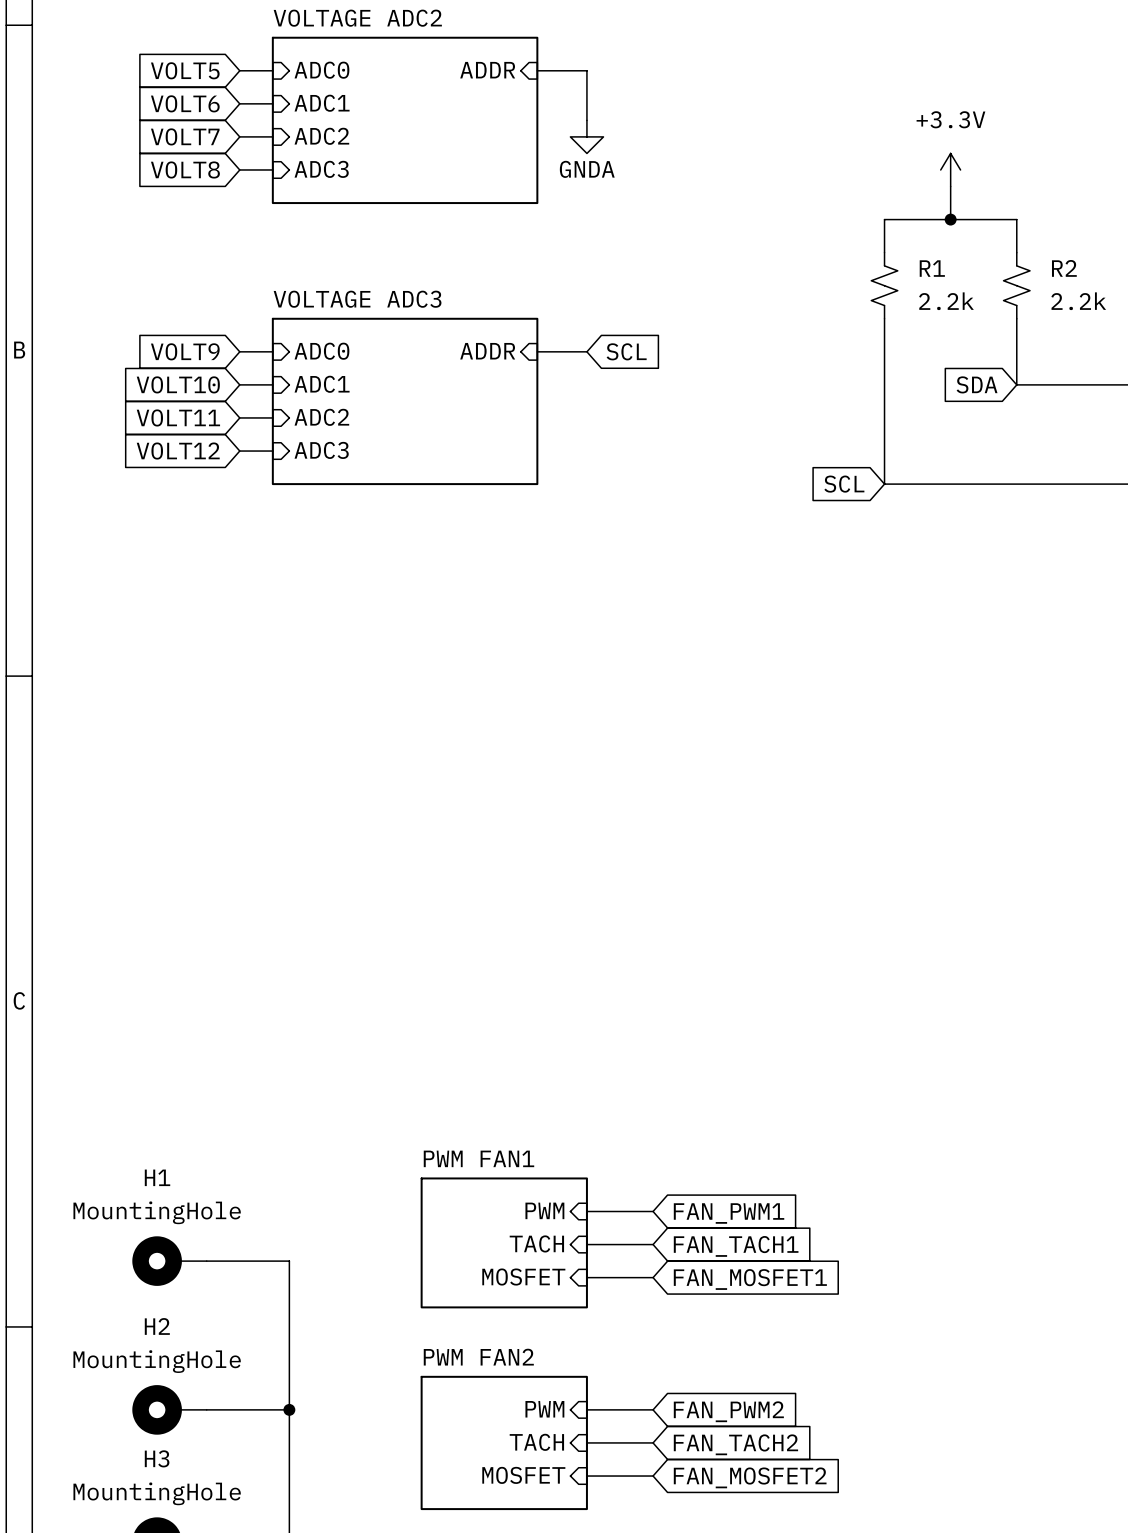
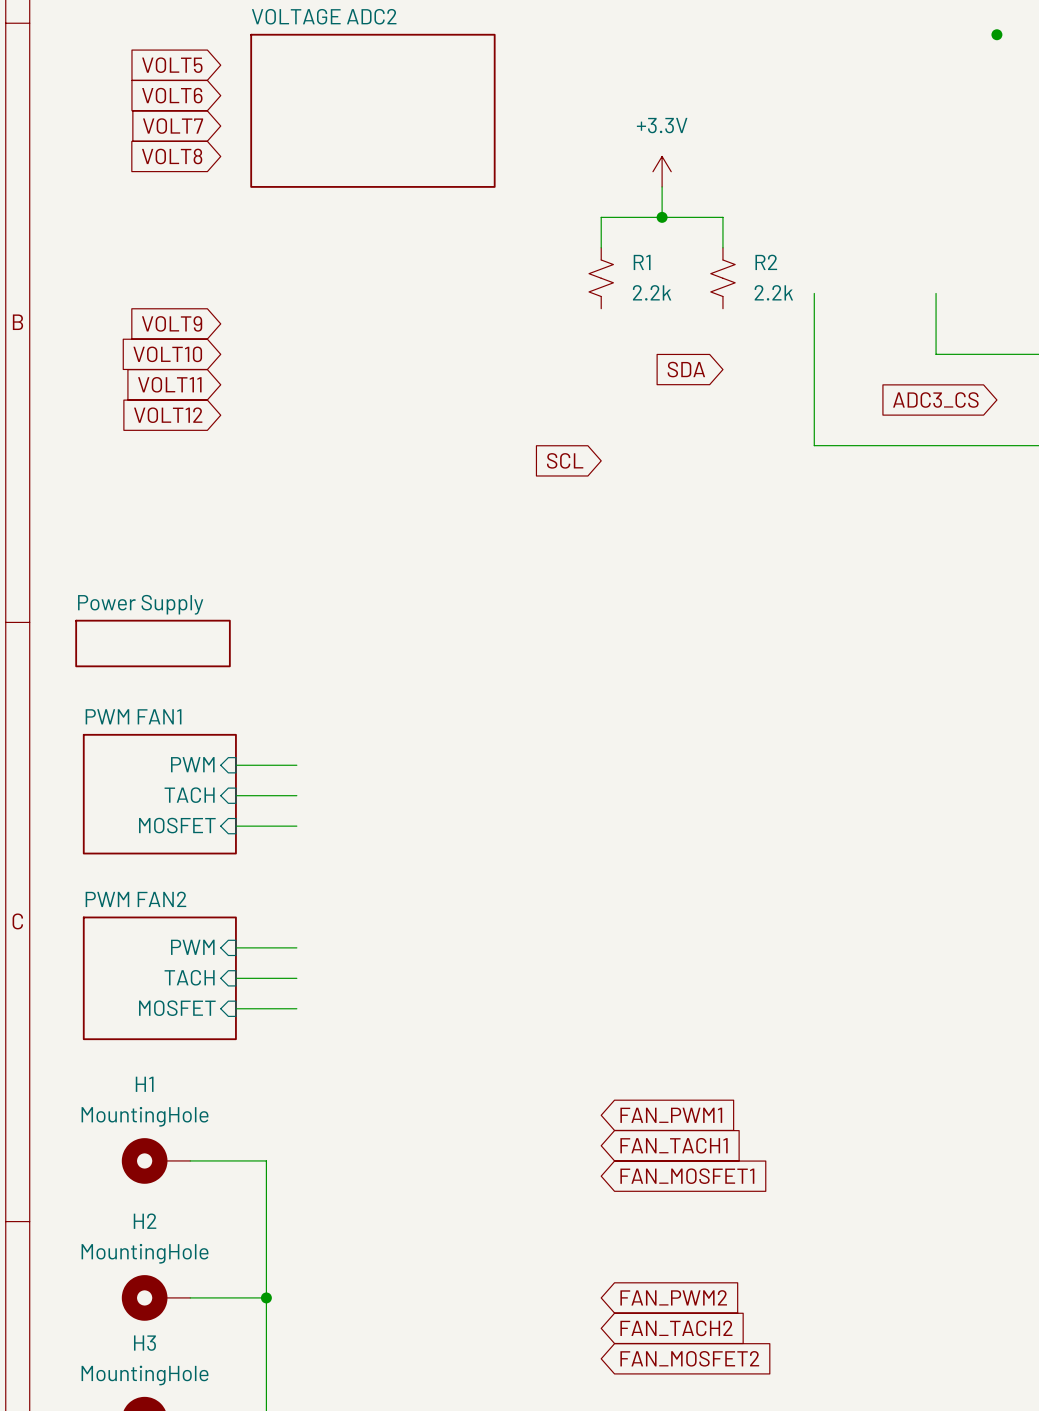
junction: none -> (996, 34)
wire: (239, 70) (272, 70) -> none
sheet pin: ADC0 (321, 70) -> none
sheet pin: ADDR (487, 70) -> none
wire: (537, 70) (586, 70) (586, 120) -> none
wire: (239, 103) (272, 103) -> none
sheet pin: ADC1 (322, 103) -> none
wire: (239, 136) (272, 136) -> none
sheet pin: ADC2 (321, 136) -> none
power symbol: GNDA (586, 136) -> none
wire: (239, 169) (272, 169) -> none
sheet pin: ADC3 (321, 169) -> none
power symbol: +3.3V (950, 169) -> none
power symbol: none -> +3.3V (662, 171)
wire: (950, 186) (950, 219) -> (662, 186) (662, 217)
junction: (950, 219) -> none
junction: none -> (662, 217)
wire: (884, 252) (884, 219) (1016, 219) (1016, 252) -> (601, 247) (601, 217) (722, 217) (722, 247)
R1 position: (884, 285) -> (601, 278)
R2 position: (1016, 285) -> (722, 278)
wire: (239, 351) (272, 351) -> none
sheet pin: ADC0 (321, 351) -> none
sheet pin: ADDR (487, 351) -> none
wire: (537, 351) (586, 351) -> none
global label: SCL (626, 351) -> none
wire: (239, 384) (272, 384) -> none
sheet pin: ADC1 (322, 384) -> none
global label position: SDA (977, 384) -> SDA (686, 369)
sheet VOLTAGE ADC3: (405, 401) -> none
wire: (239, 417) (272, 417) -> none
sheet pin: ADC2 (321, 417) -> none
global label: none -> ADC3_CS (935, 400)
sheet pin: ADC3 (321, 450) -> none
wire: (239, 451) (272, 451) -> none
global label: SCL (844, 484) -> none
global label: none -> SCL (565, 460)
sheet Power Supply: none -> (153, 643)
sheet pin: none -> PWM (192, 764)
wire: none -> (235, 765) (296, 765)
sheet pin: none -> TACH (189, 795)
wire: none -> (235, 795) (296, 795)
sheet pin: none -> MOSFET (177, 825)
wire: none -> (235, 826) (296, 826)
sheet pin: none -> PWM (192, 947)
wire: none -> (235, 947) (296, 947)
sheet pin: none -> TACH (189, 977)
wire: none -> (235, 978) (296, 978)
sheet pin: none -> MOSFET (177, 1008)
wire: none -> (235, 1008) (296, 1008)
sheet pin: PWM (544, 1210) -> none
wire: (586, 1211) (653, 1211) -> none
sheet PWM FAN1 position: (504, 1242) -> (159, 794)
sheet pin: TACH (536, 1243) -> none
wire: (586, 1244) (653, 1244) -> none
sheet pin: MOSFET (523, 1277) -> none
wire: (586, 1277) (653, 1277) -> none
sheet pin: PWM (544, 1409) -> none
wire: (586, 1409) (653, 1409) -> none
sheet PWM FAN2 position: (504, 1442) -> (159, 978)
sheet pin: TACH (536, 1442) -> none
wire: (586, 1442) (653, 1442) -> none
sheet pin: MOSFET (523, 1475) -> none
wire: (586, 1476) (653, 1476) -> none

